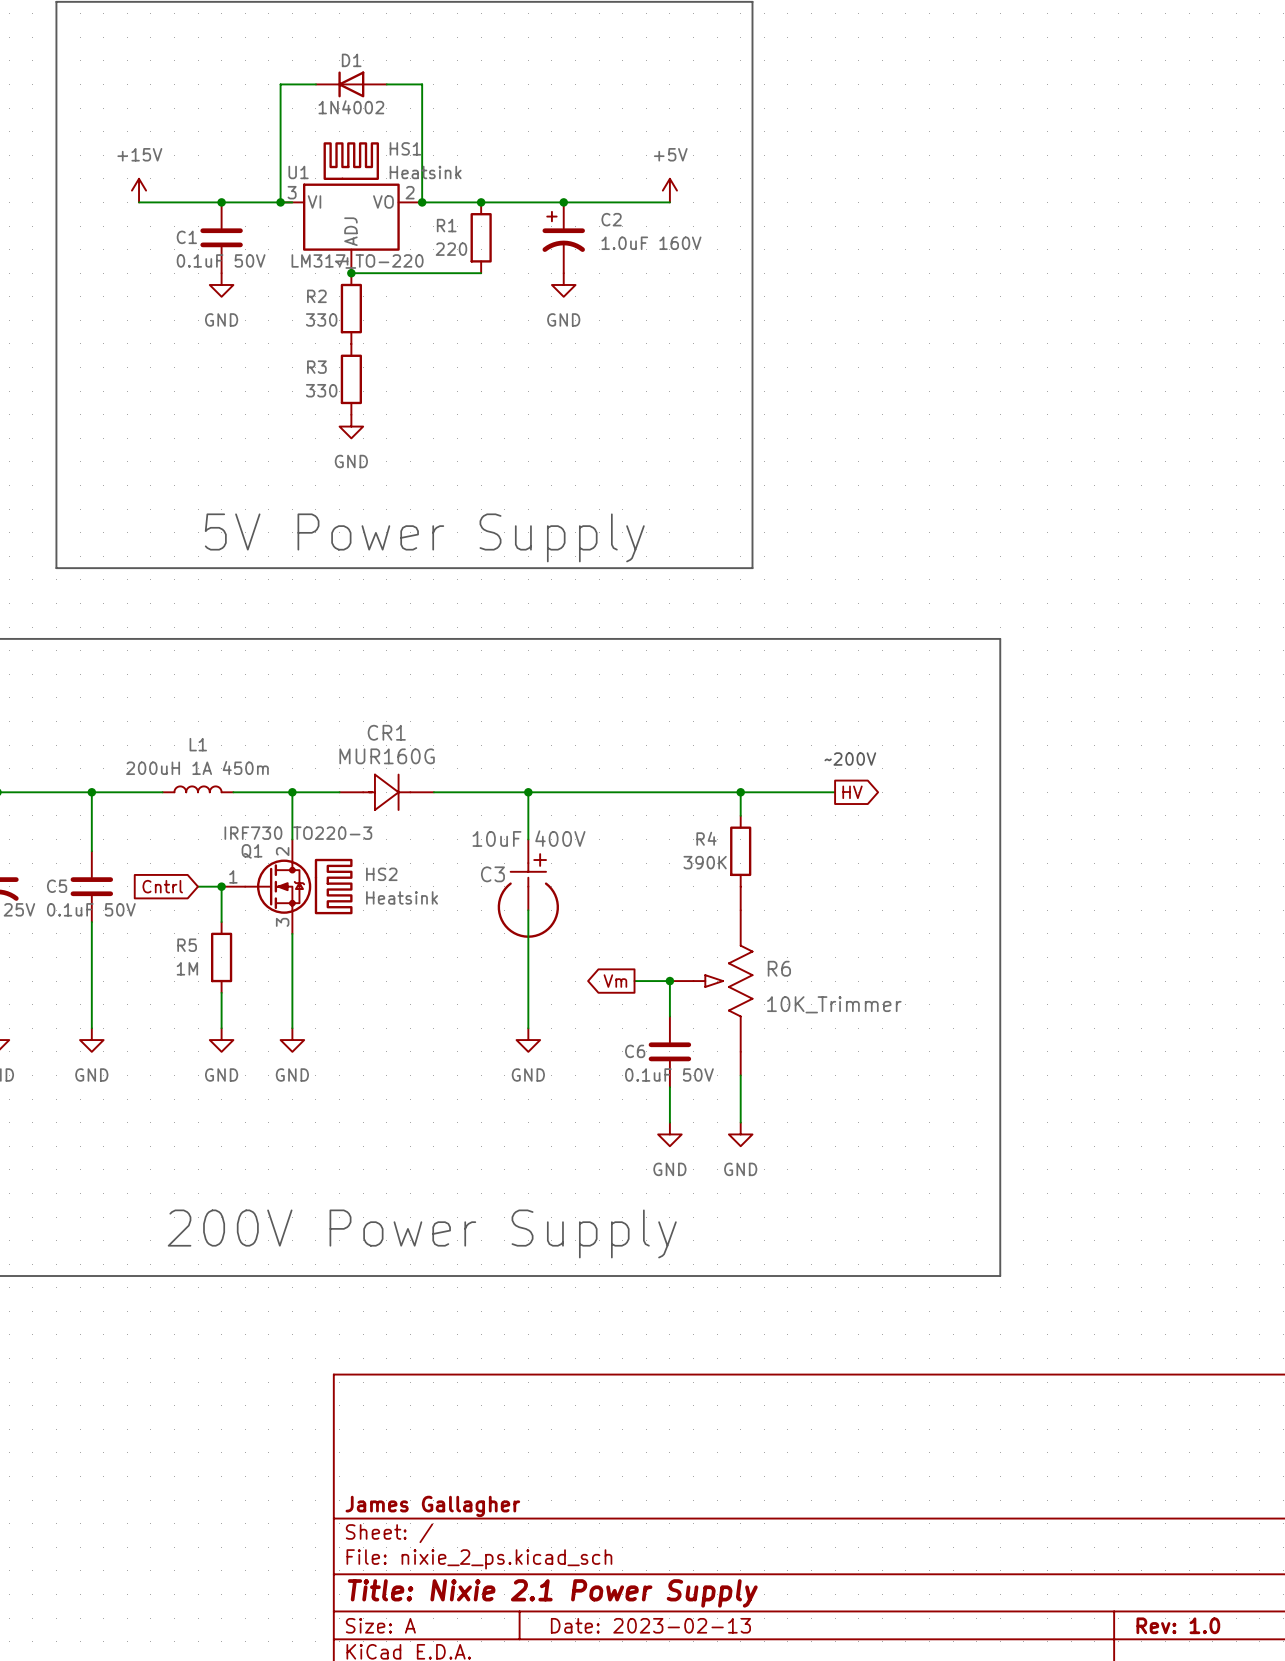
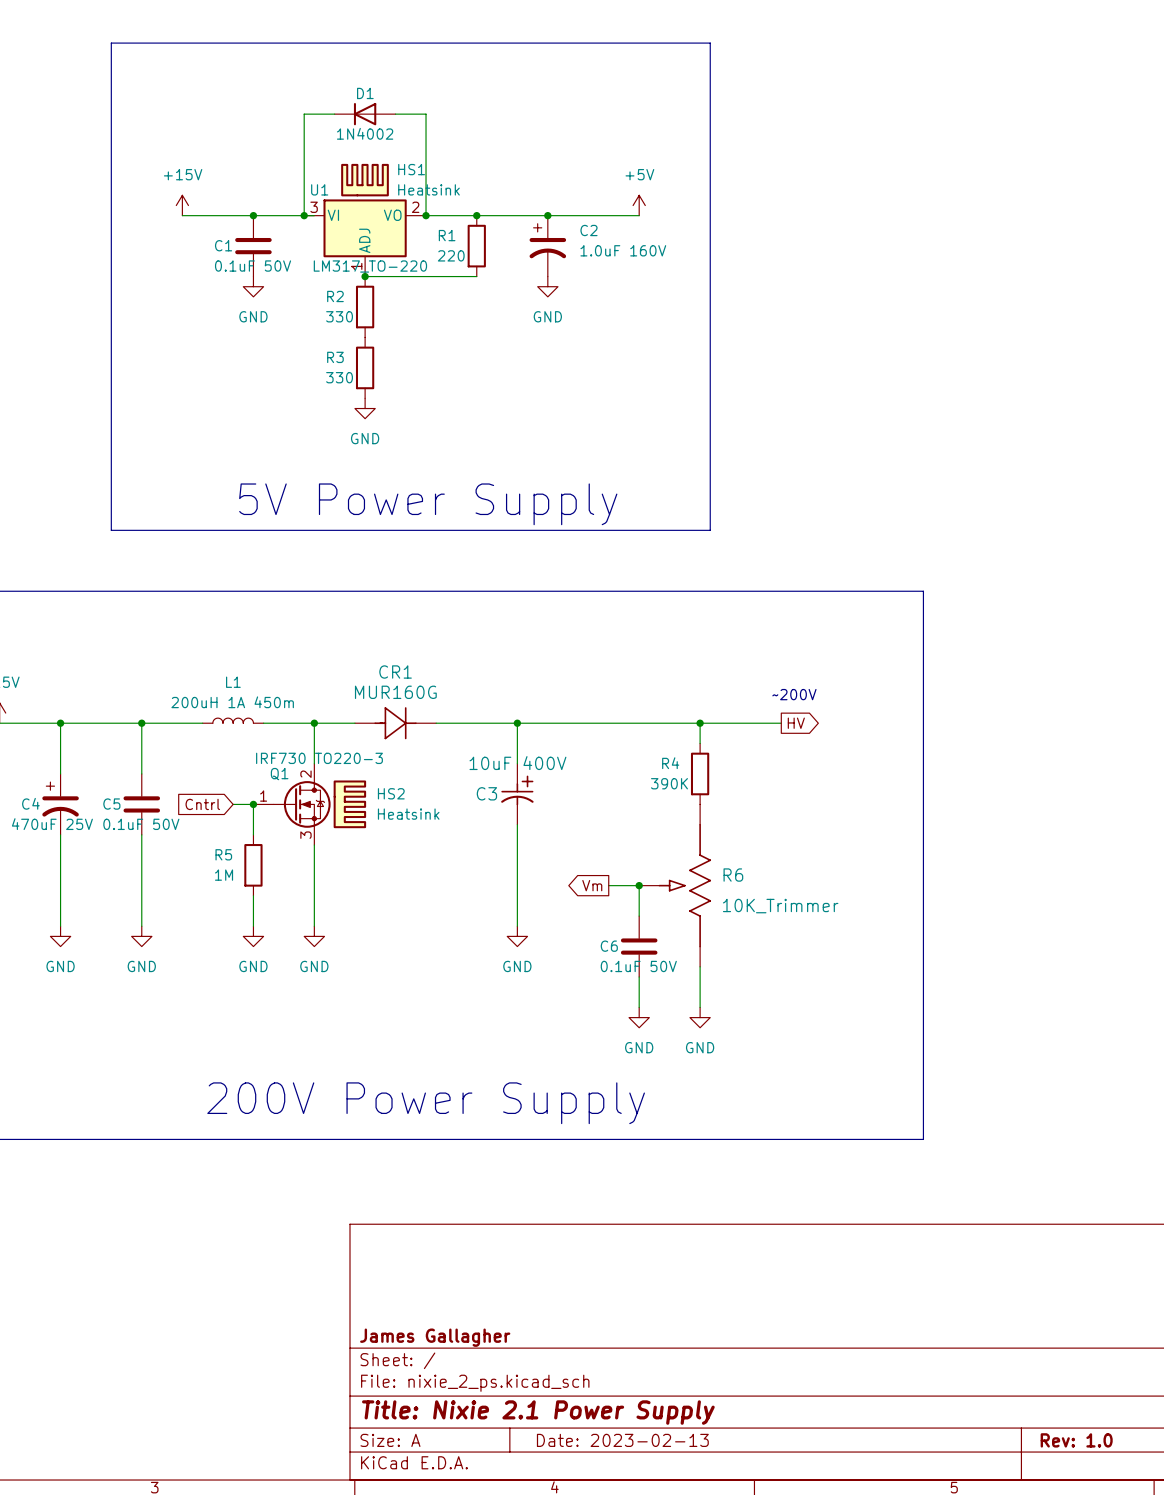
C3 symbol: [497, 839, 559, 938] -> [501, 763, 534, 825]

